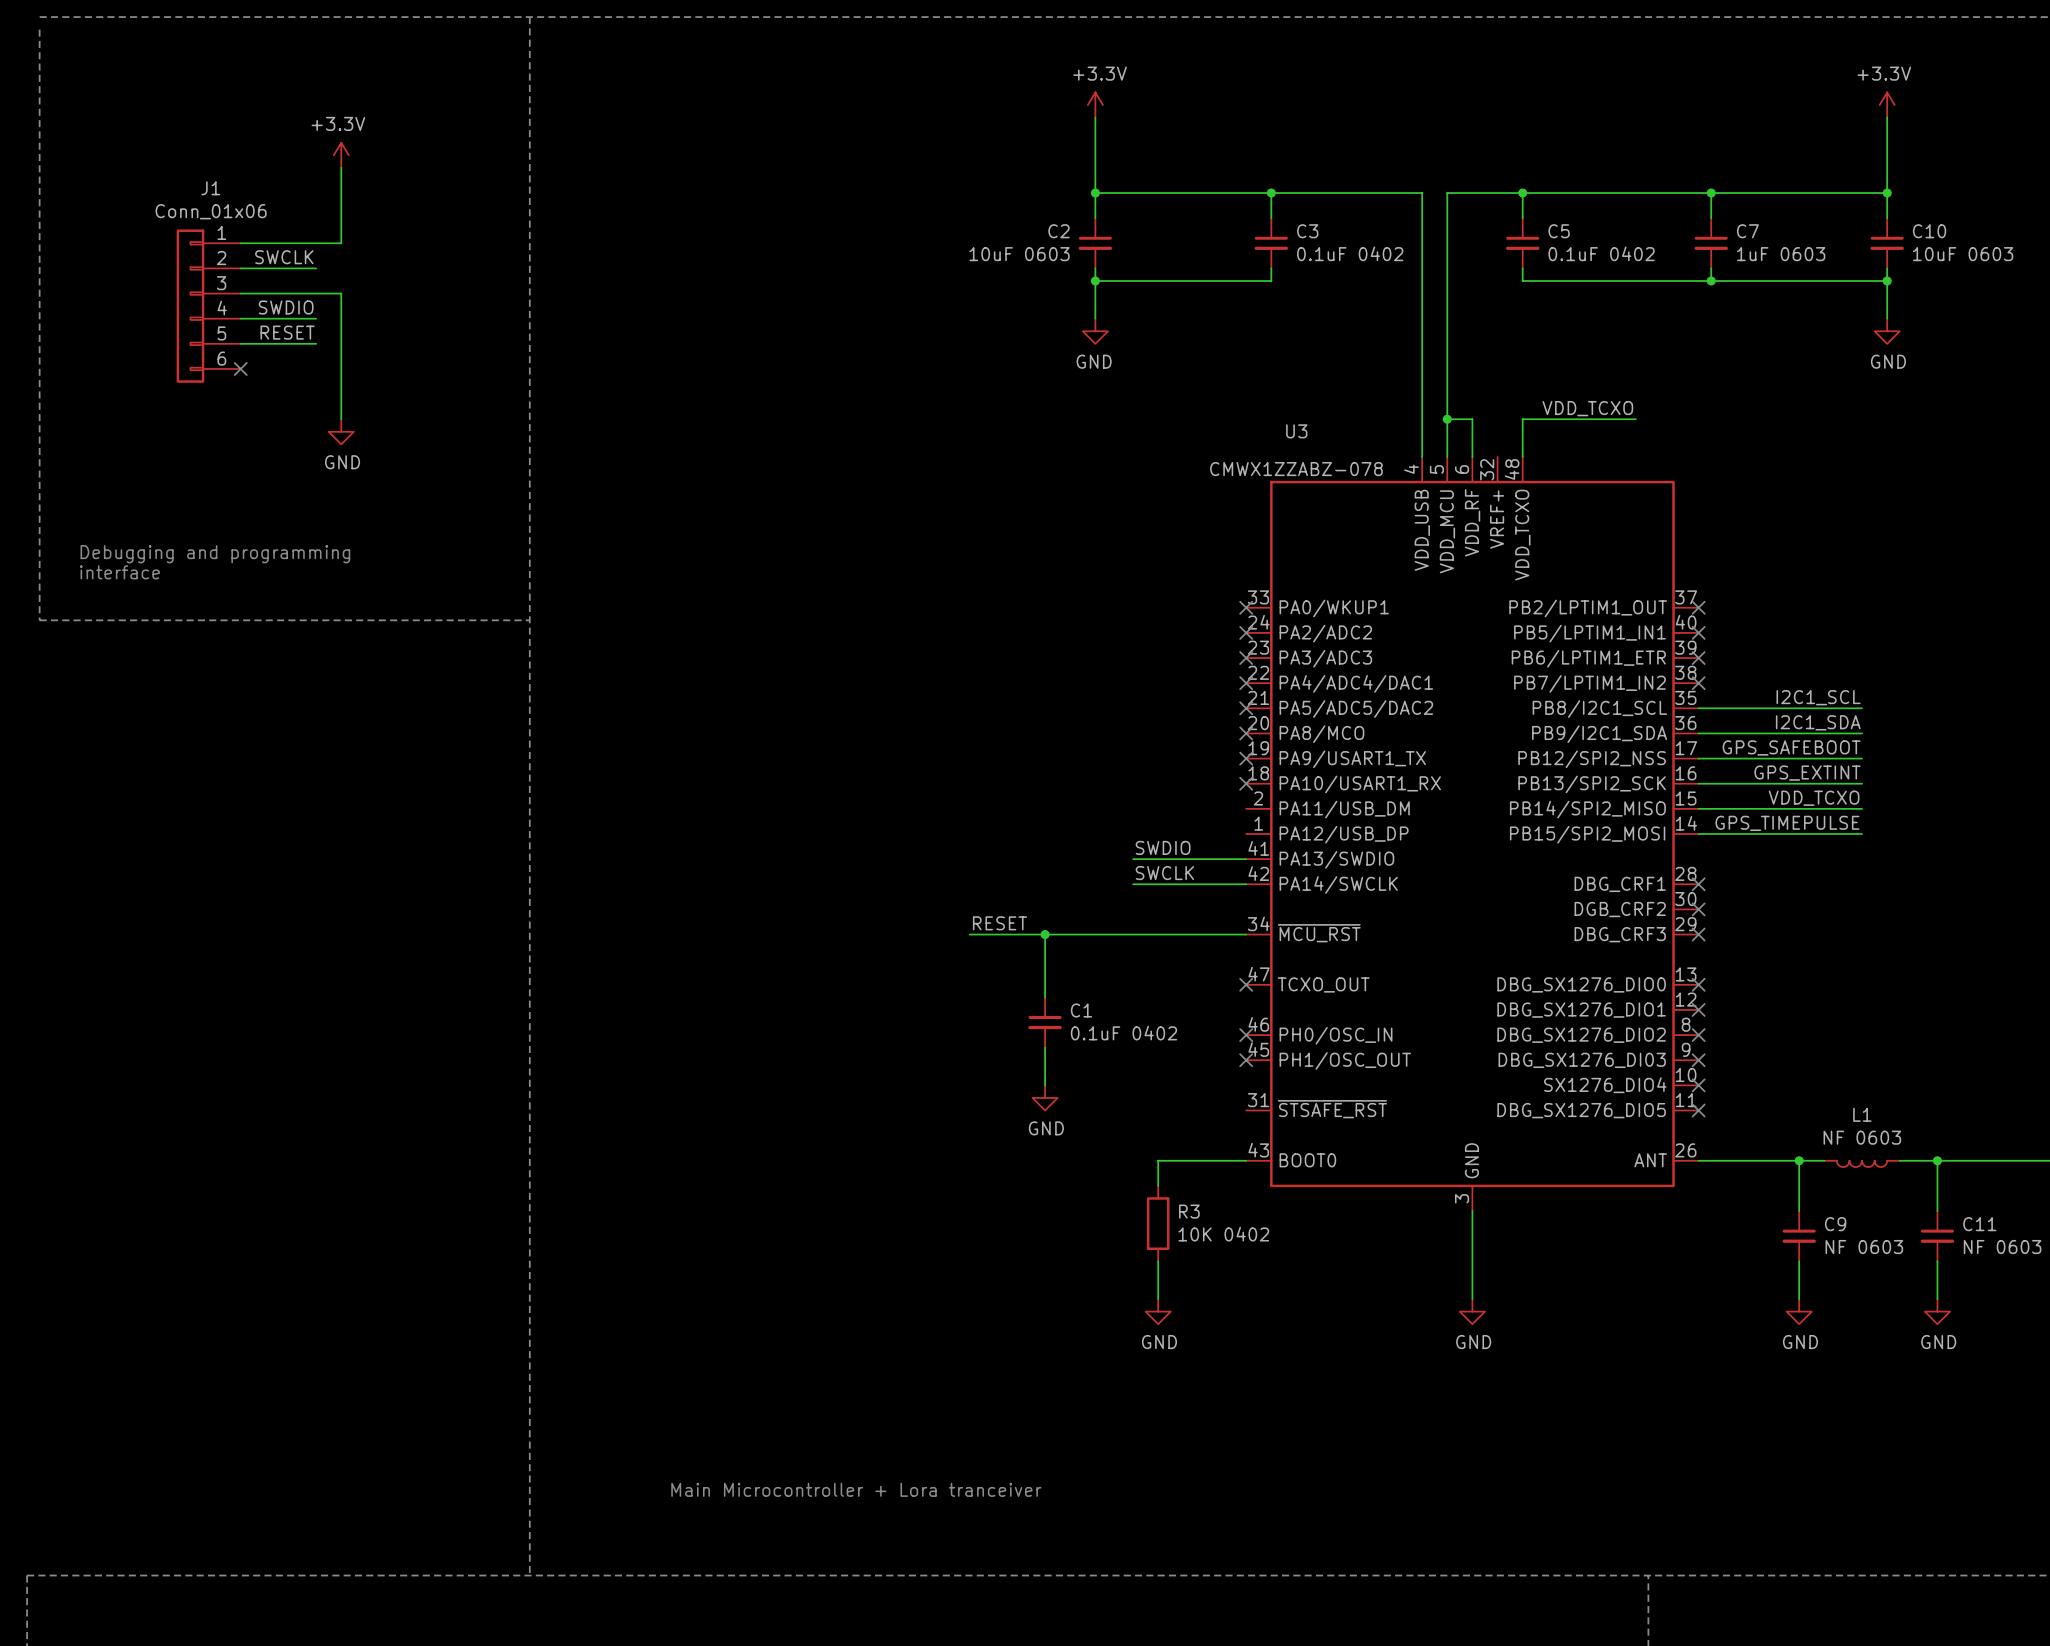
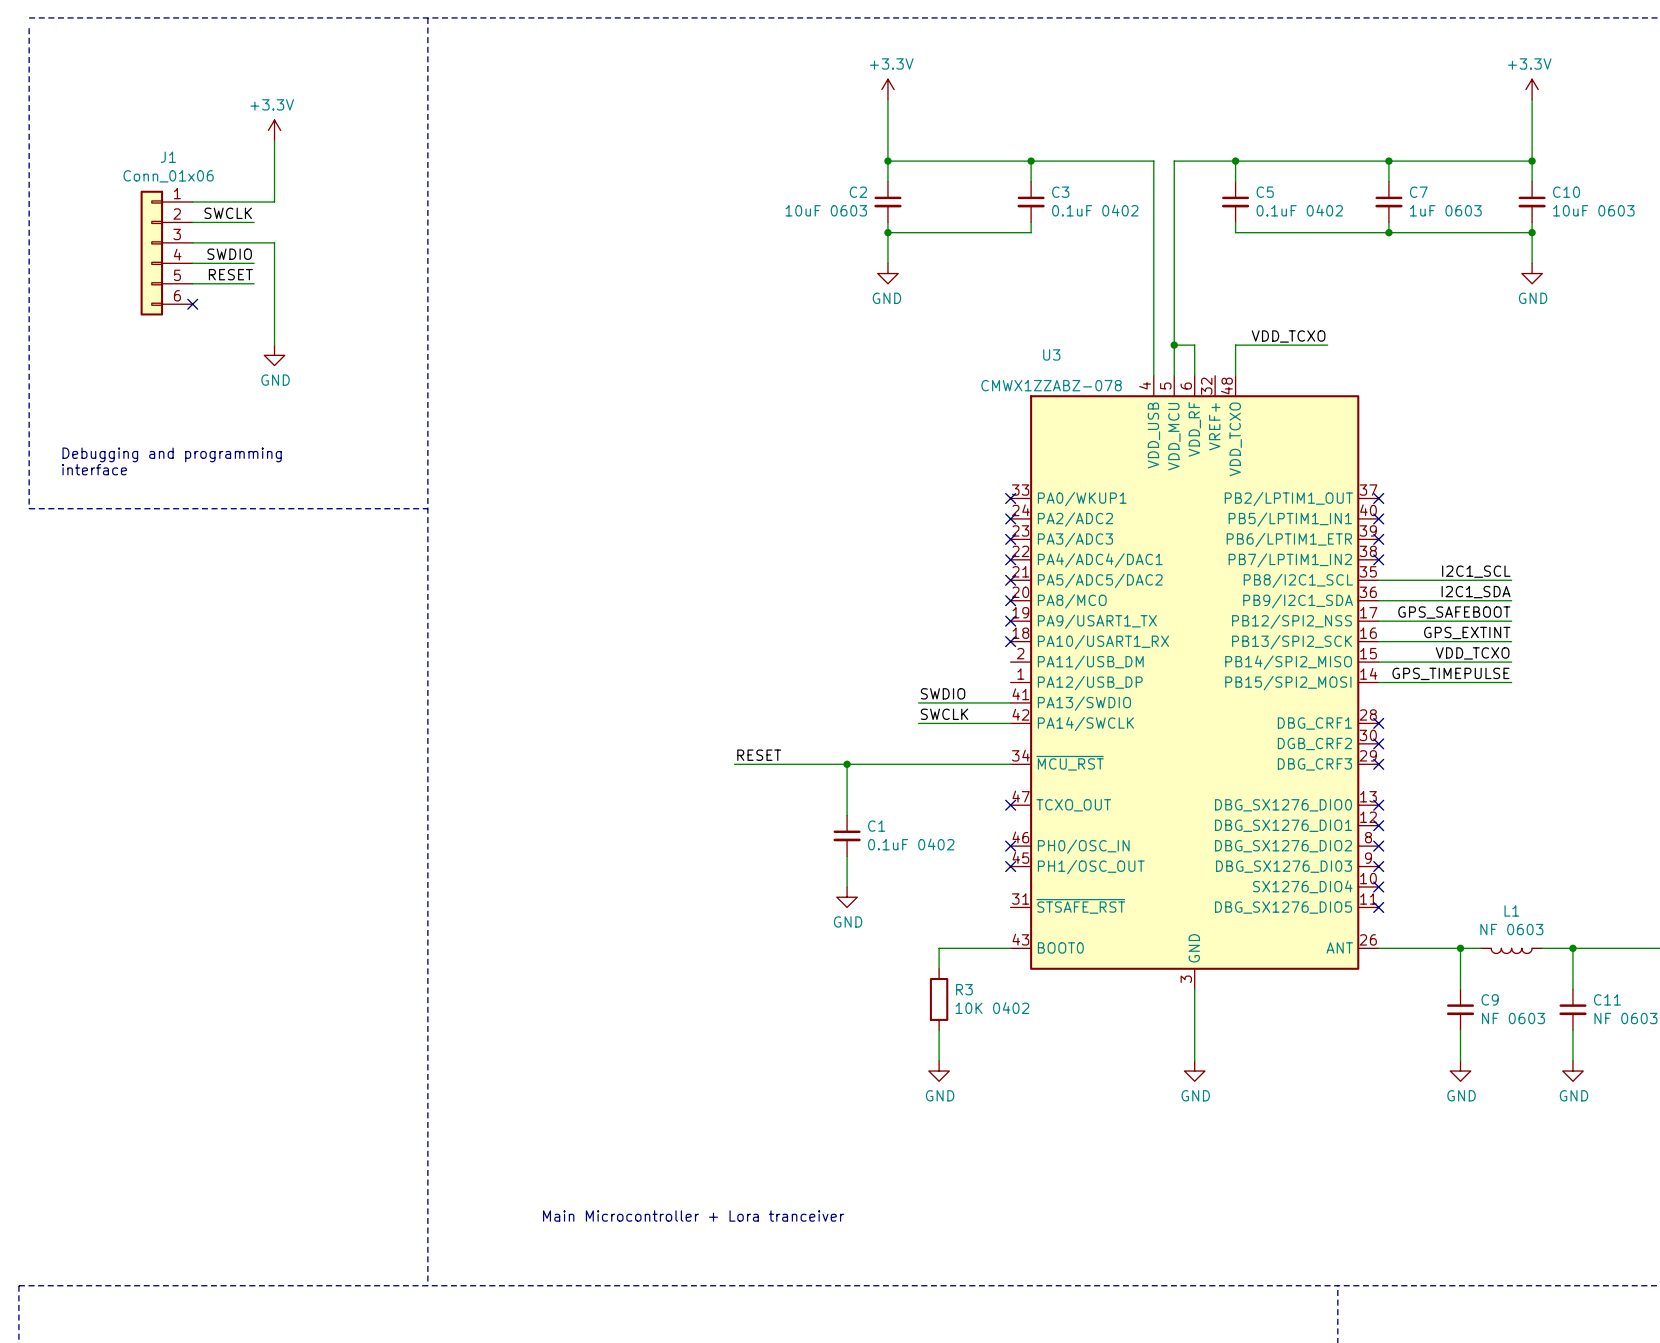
label position: RESET (1000, 923) -> RESET (759, 755)
wire: none -> (734, 764) (785, 764)

